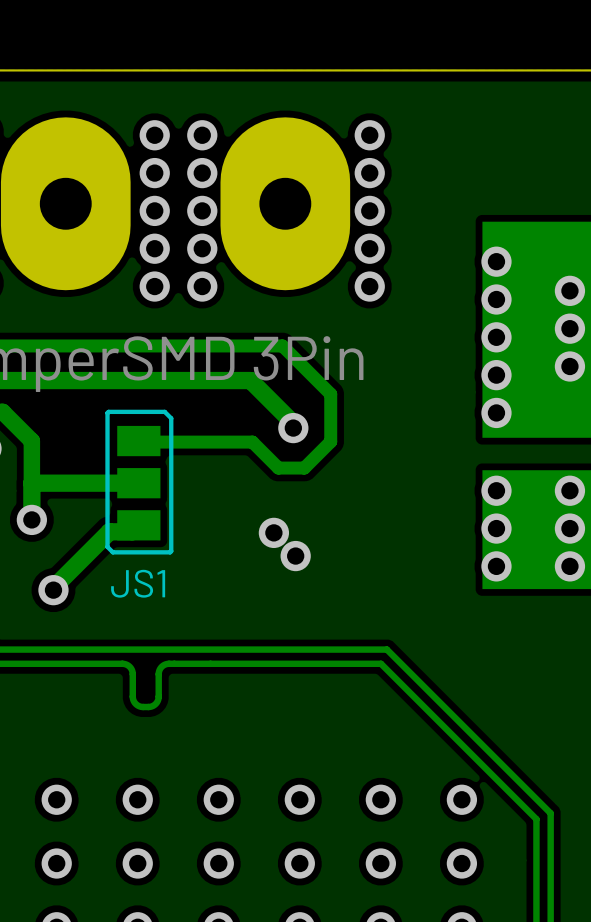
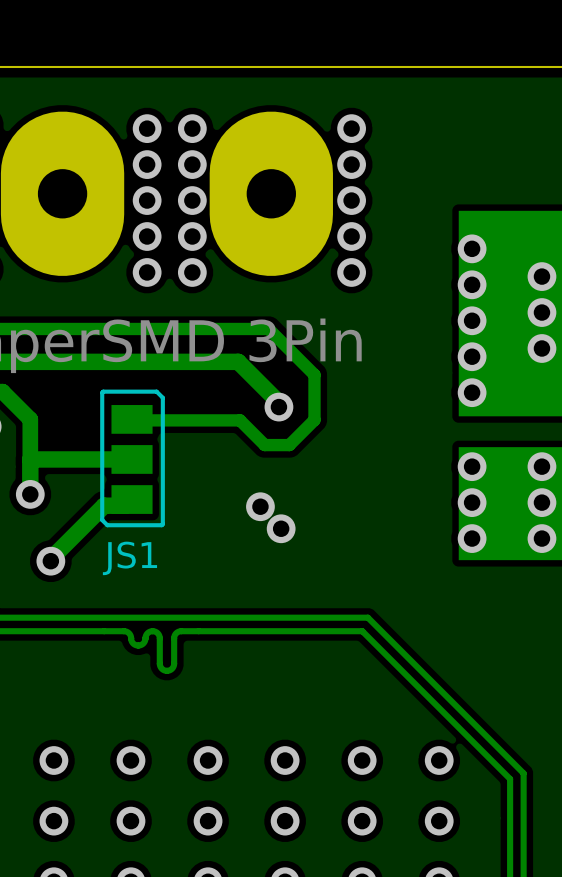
track: (190, 663) (167, 663) (161, 666) (158, 673) (158, 700) (153, 705) (148, 707) (139, 706) (134, 702) (132, 670) (127, 665) (122, 663) -> (181, 631) (176, 632) (174, 636) (173, 666) (166, 670) (162, 669) (159, 665) (159, 637) (157, 632) (148, 632) (143, 642) (138, 645) (132, 642) (127, 632) (116, 631)

